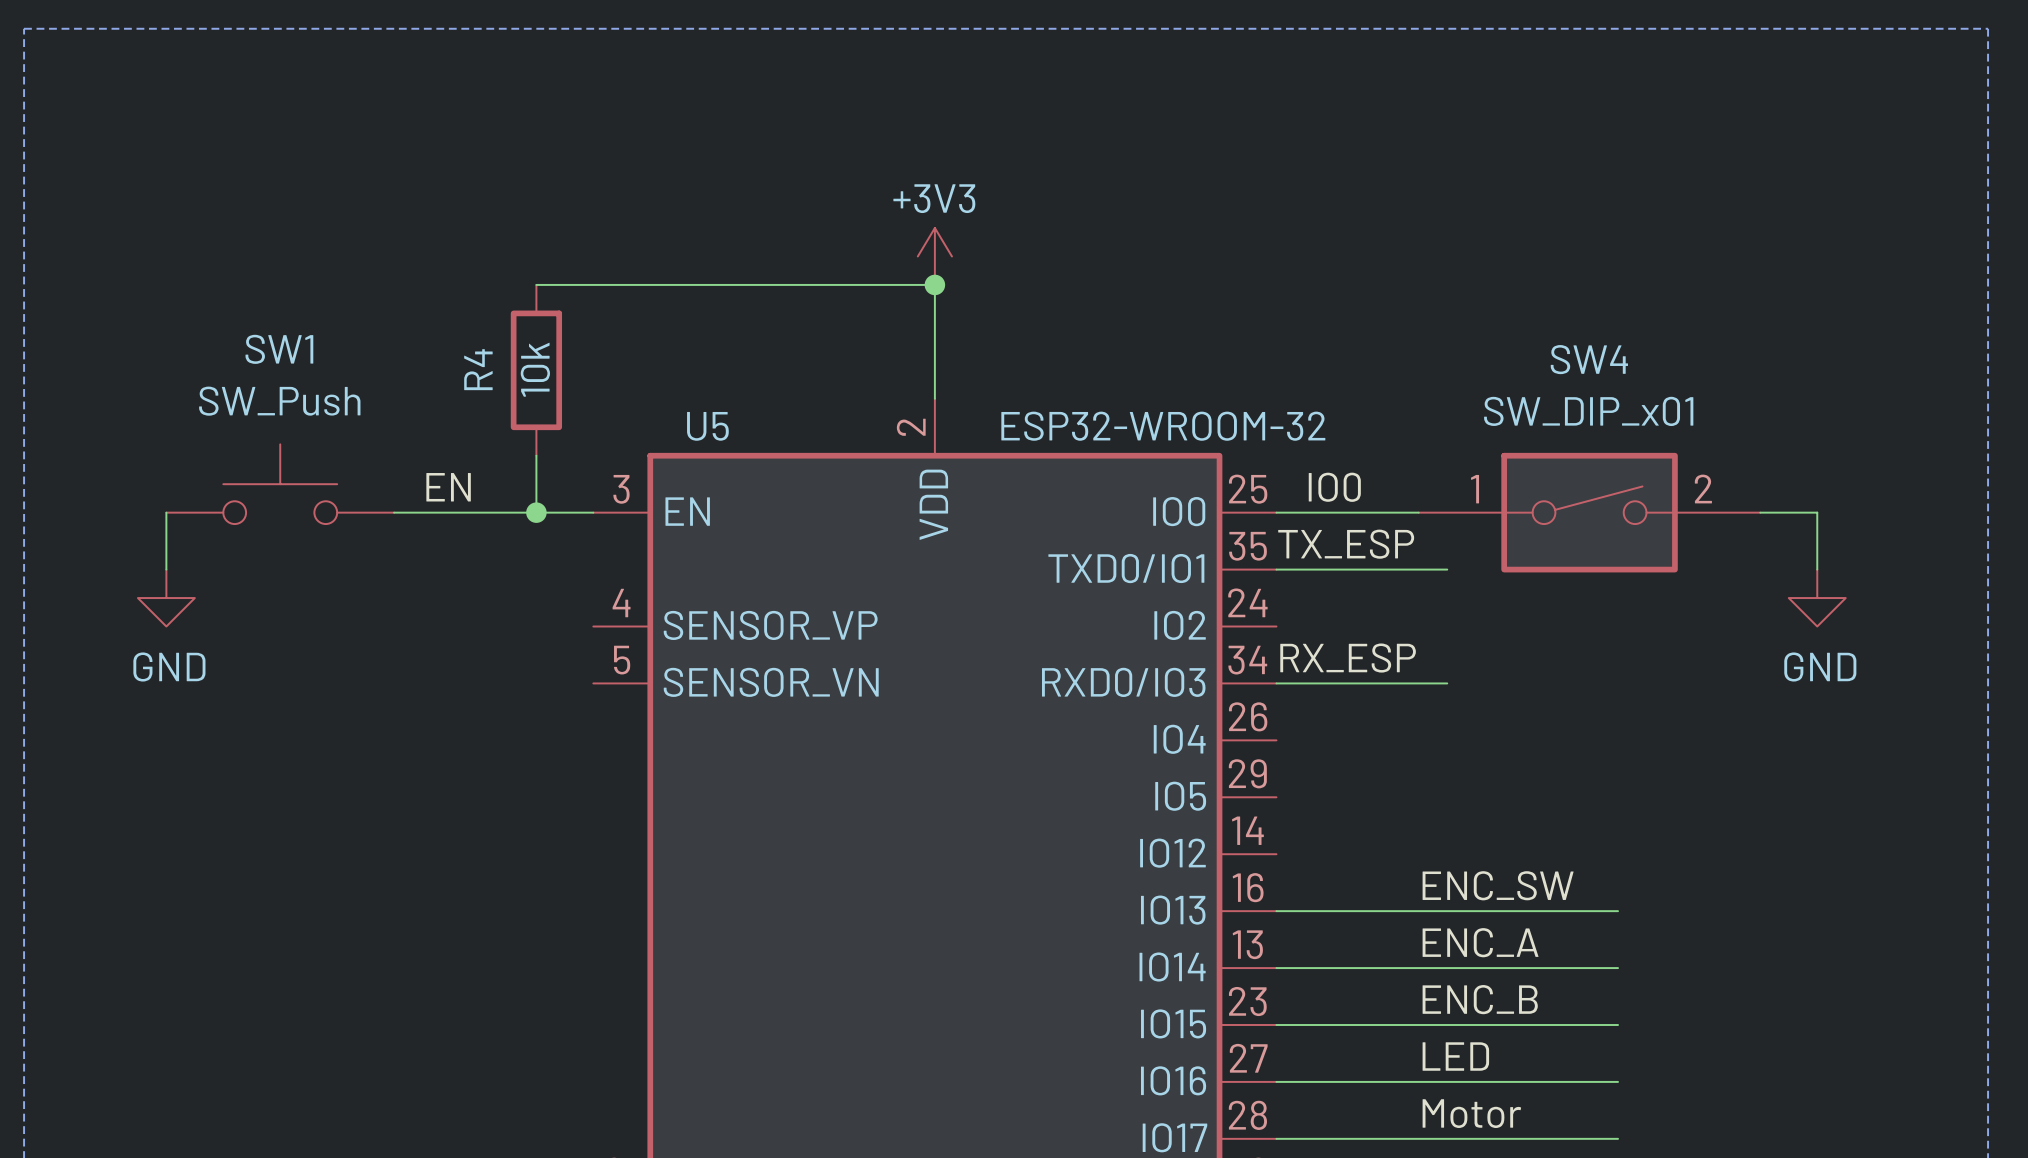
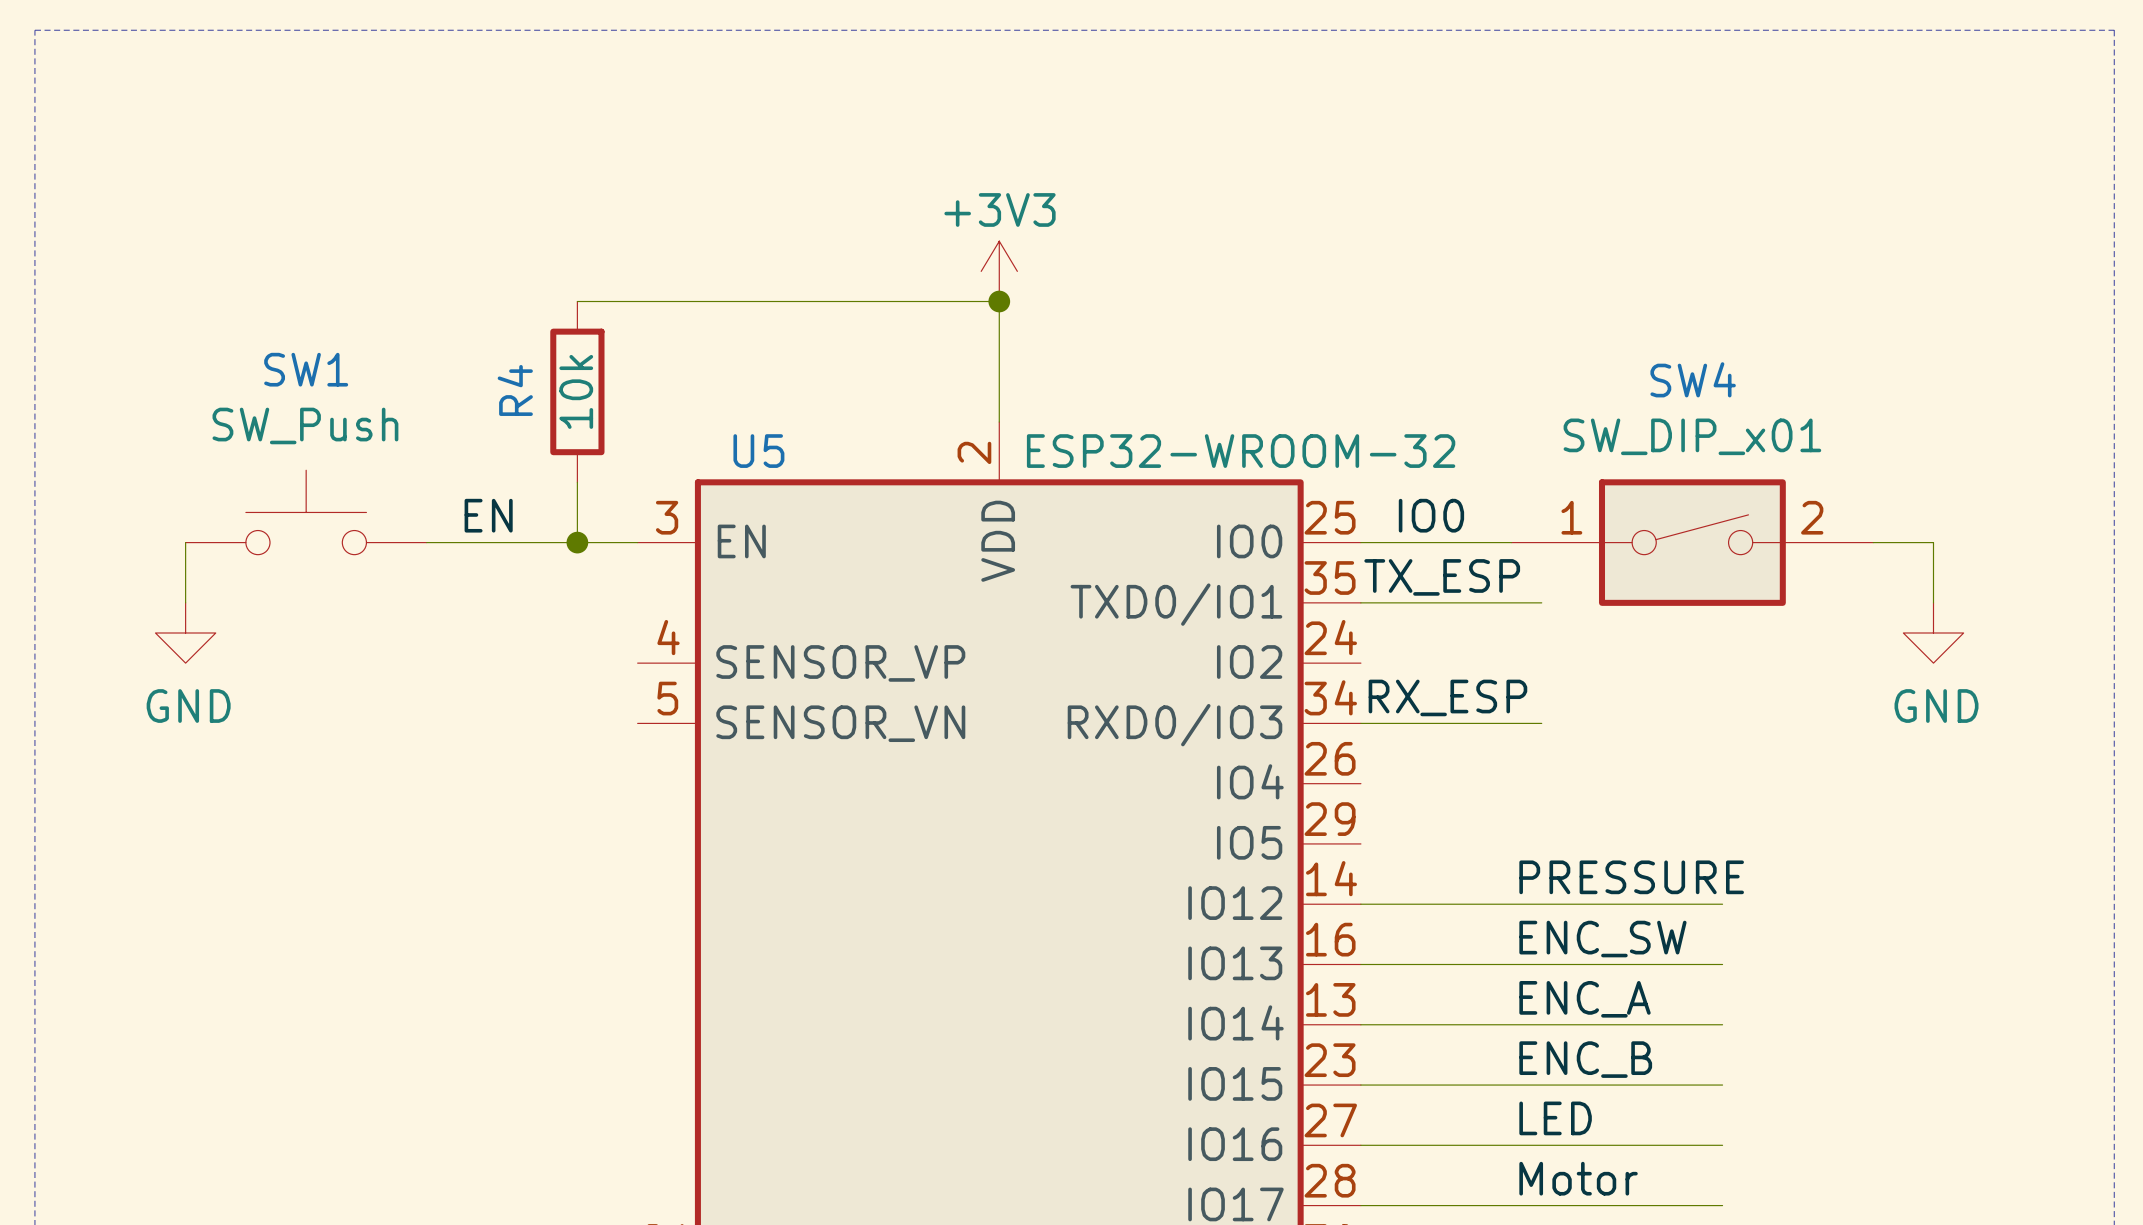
label: none -> PRESSURE (1631, 877)
wire: none -> (1360, 904) (1722, 904)

